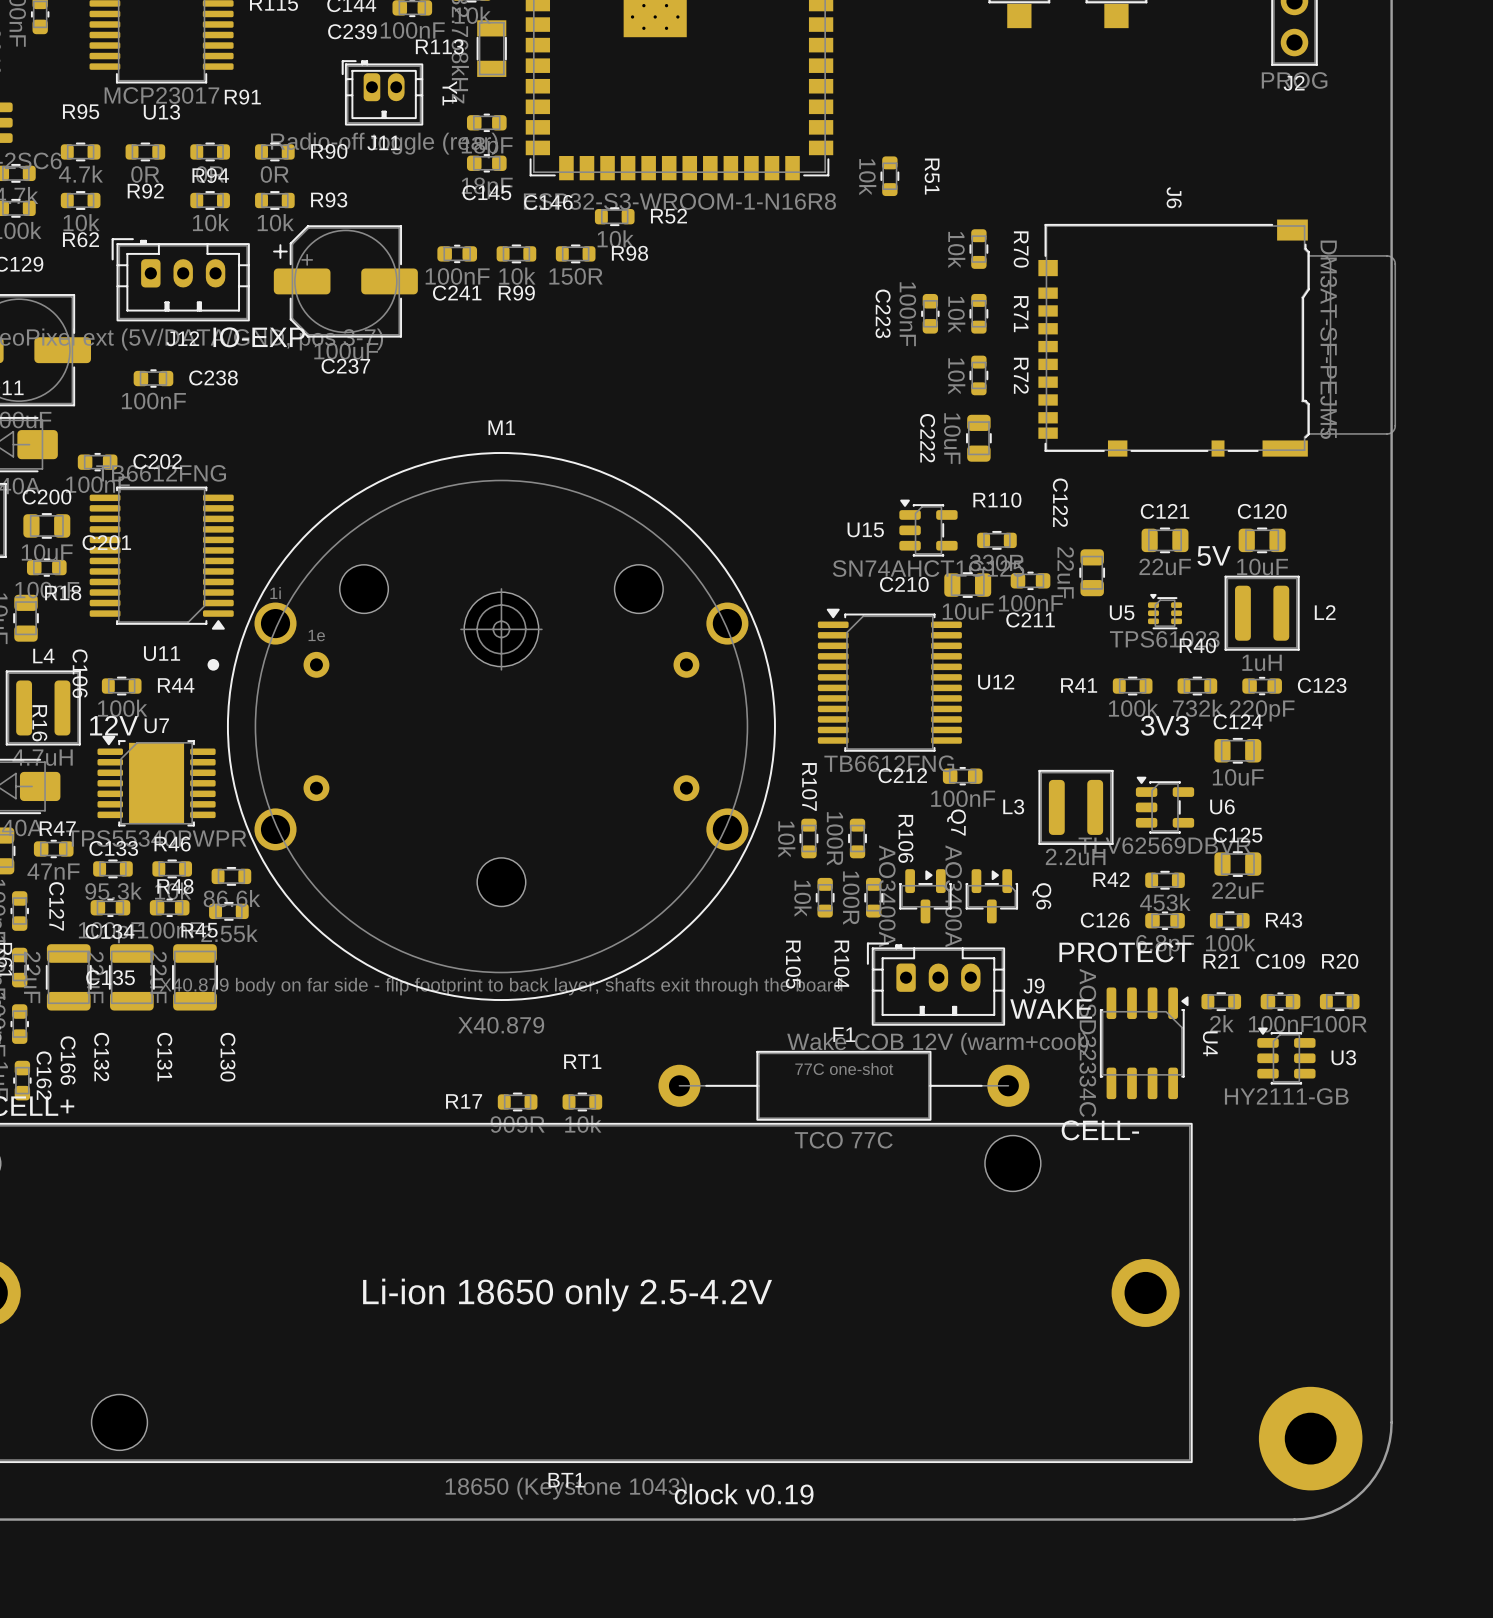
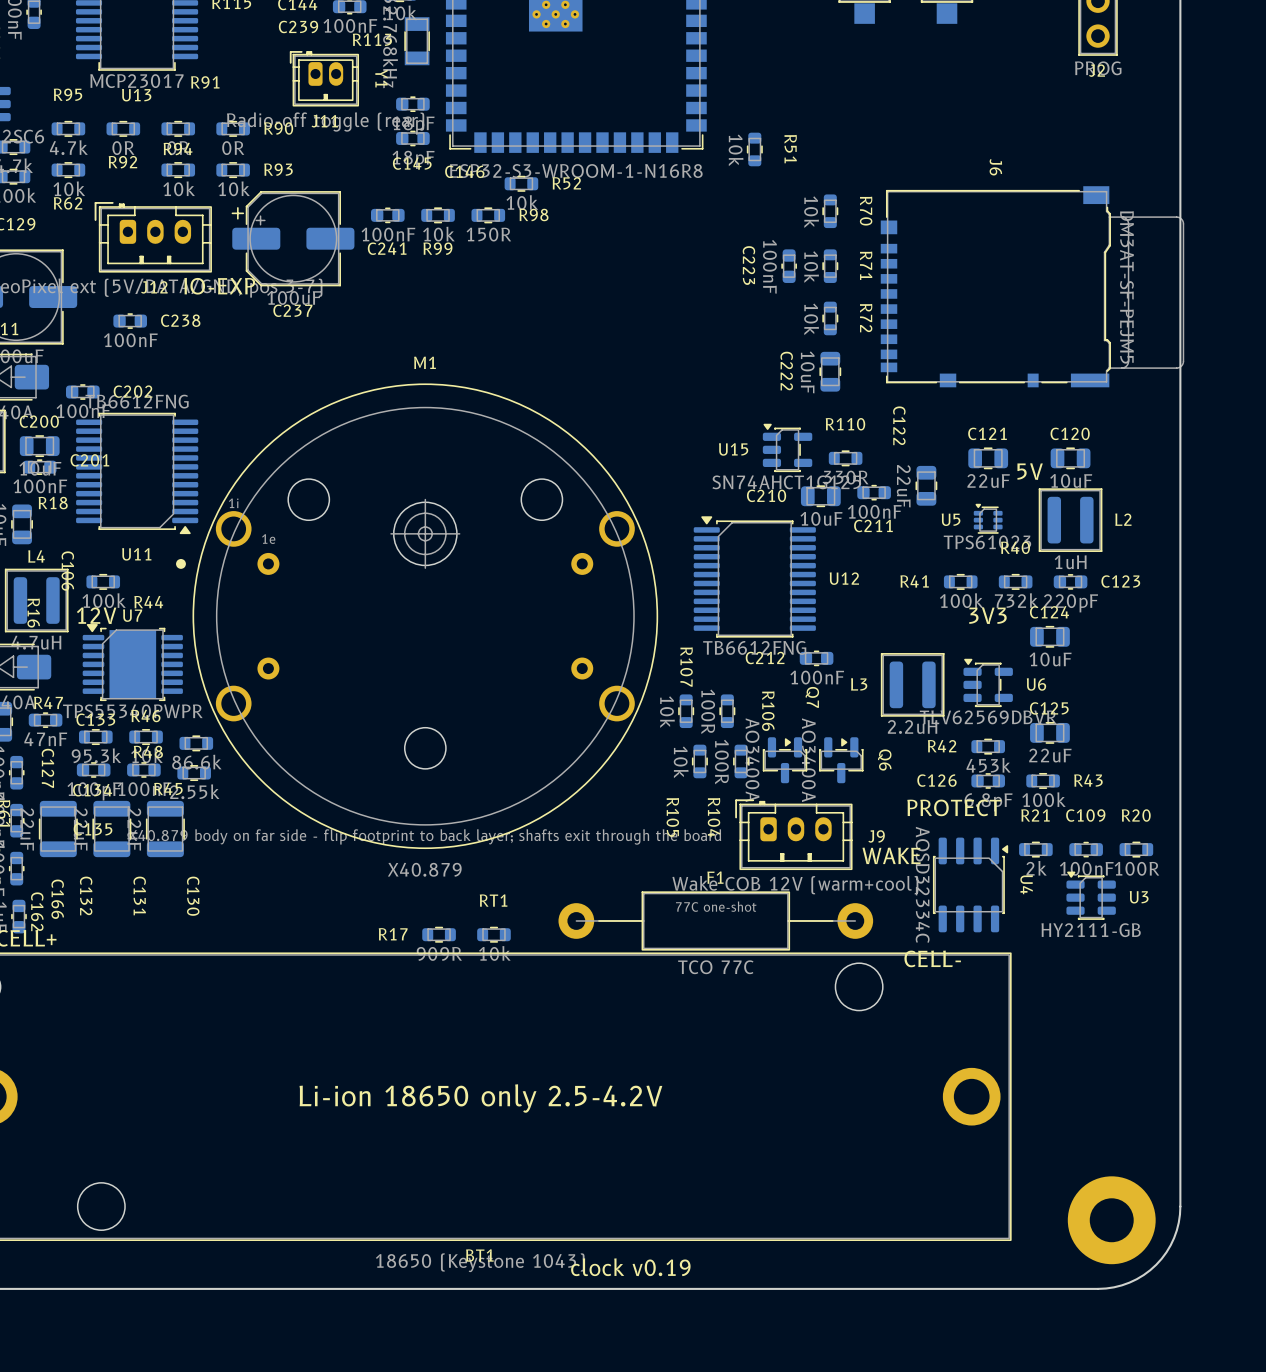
C201 position: (46, 567) -> (39, 467)
R44 name position: R44 (176, 685) -> R44 (148, 602)

